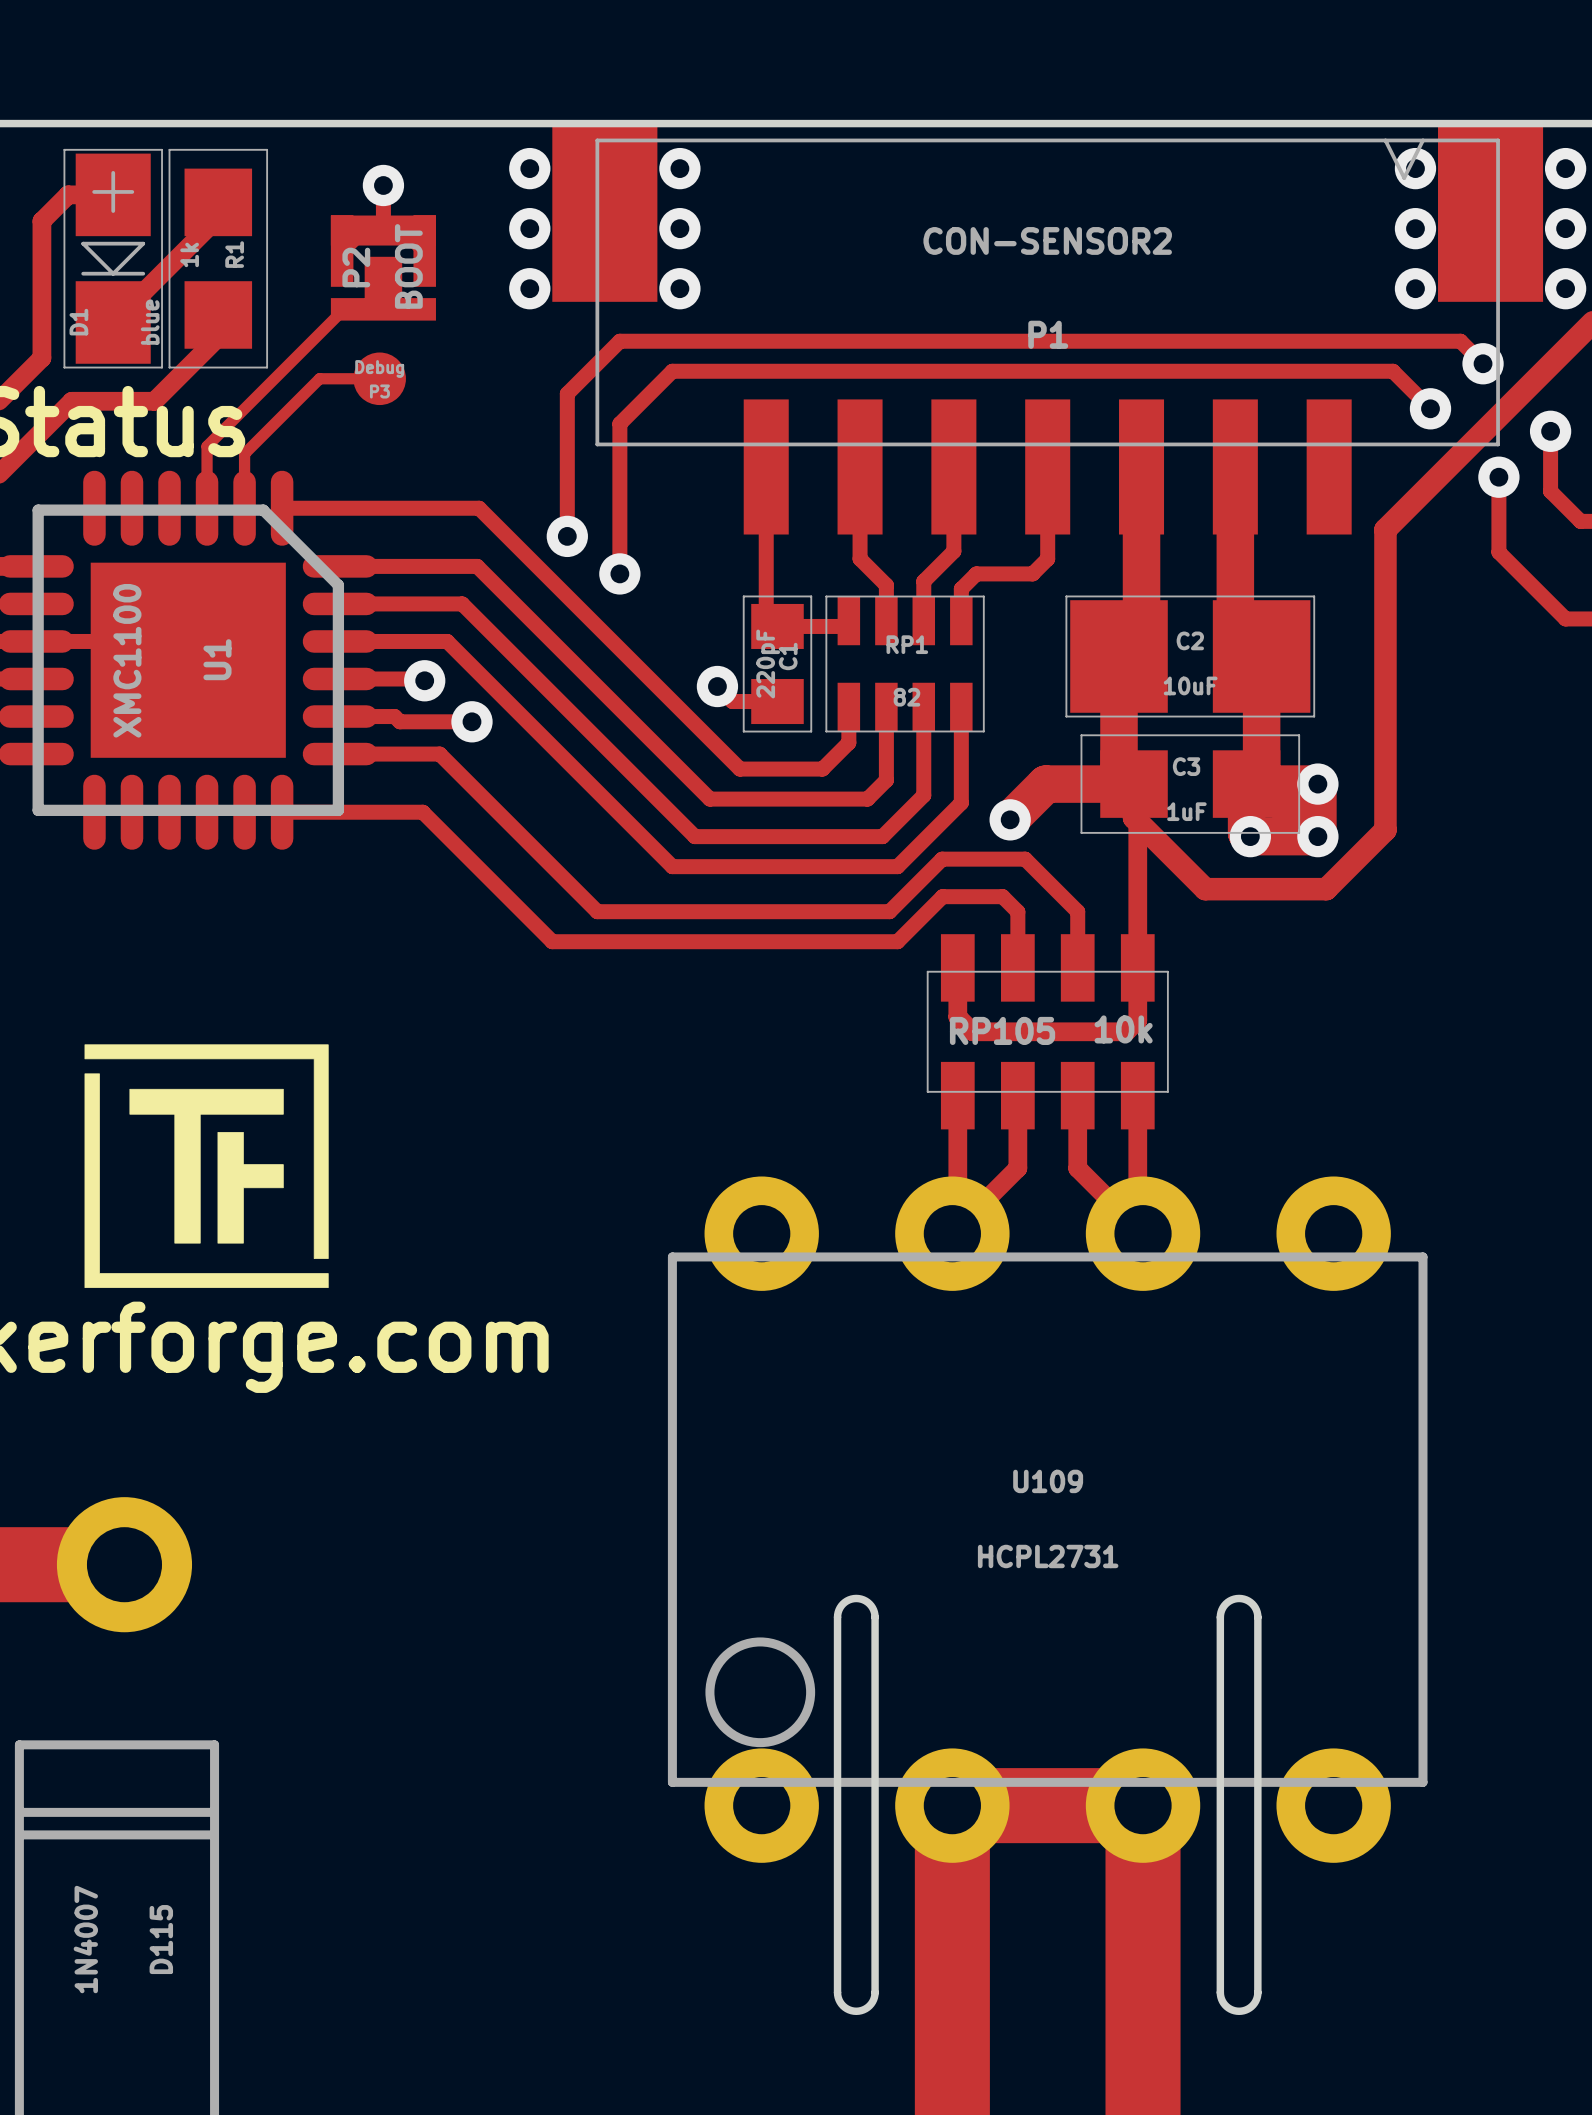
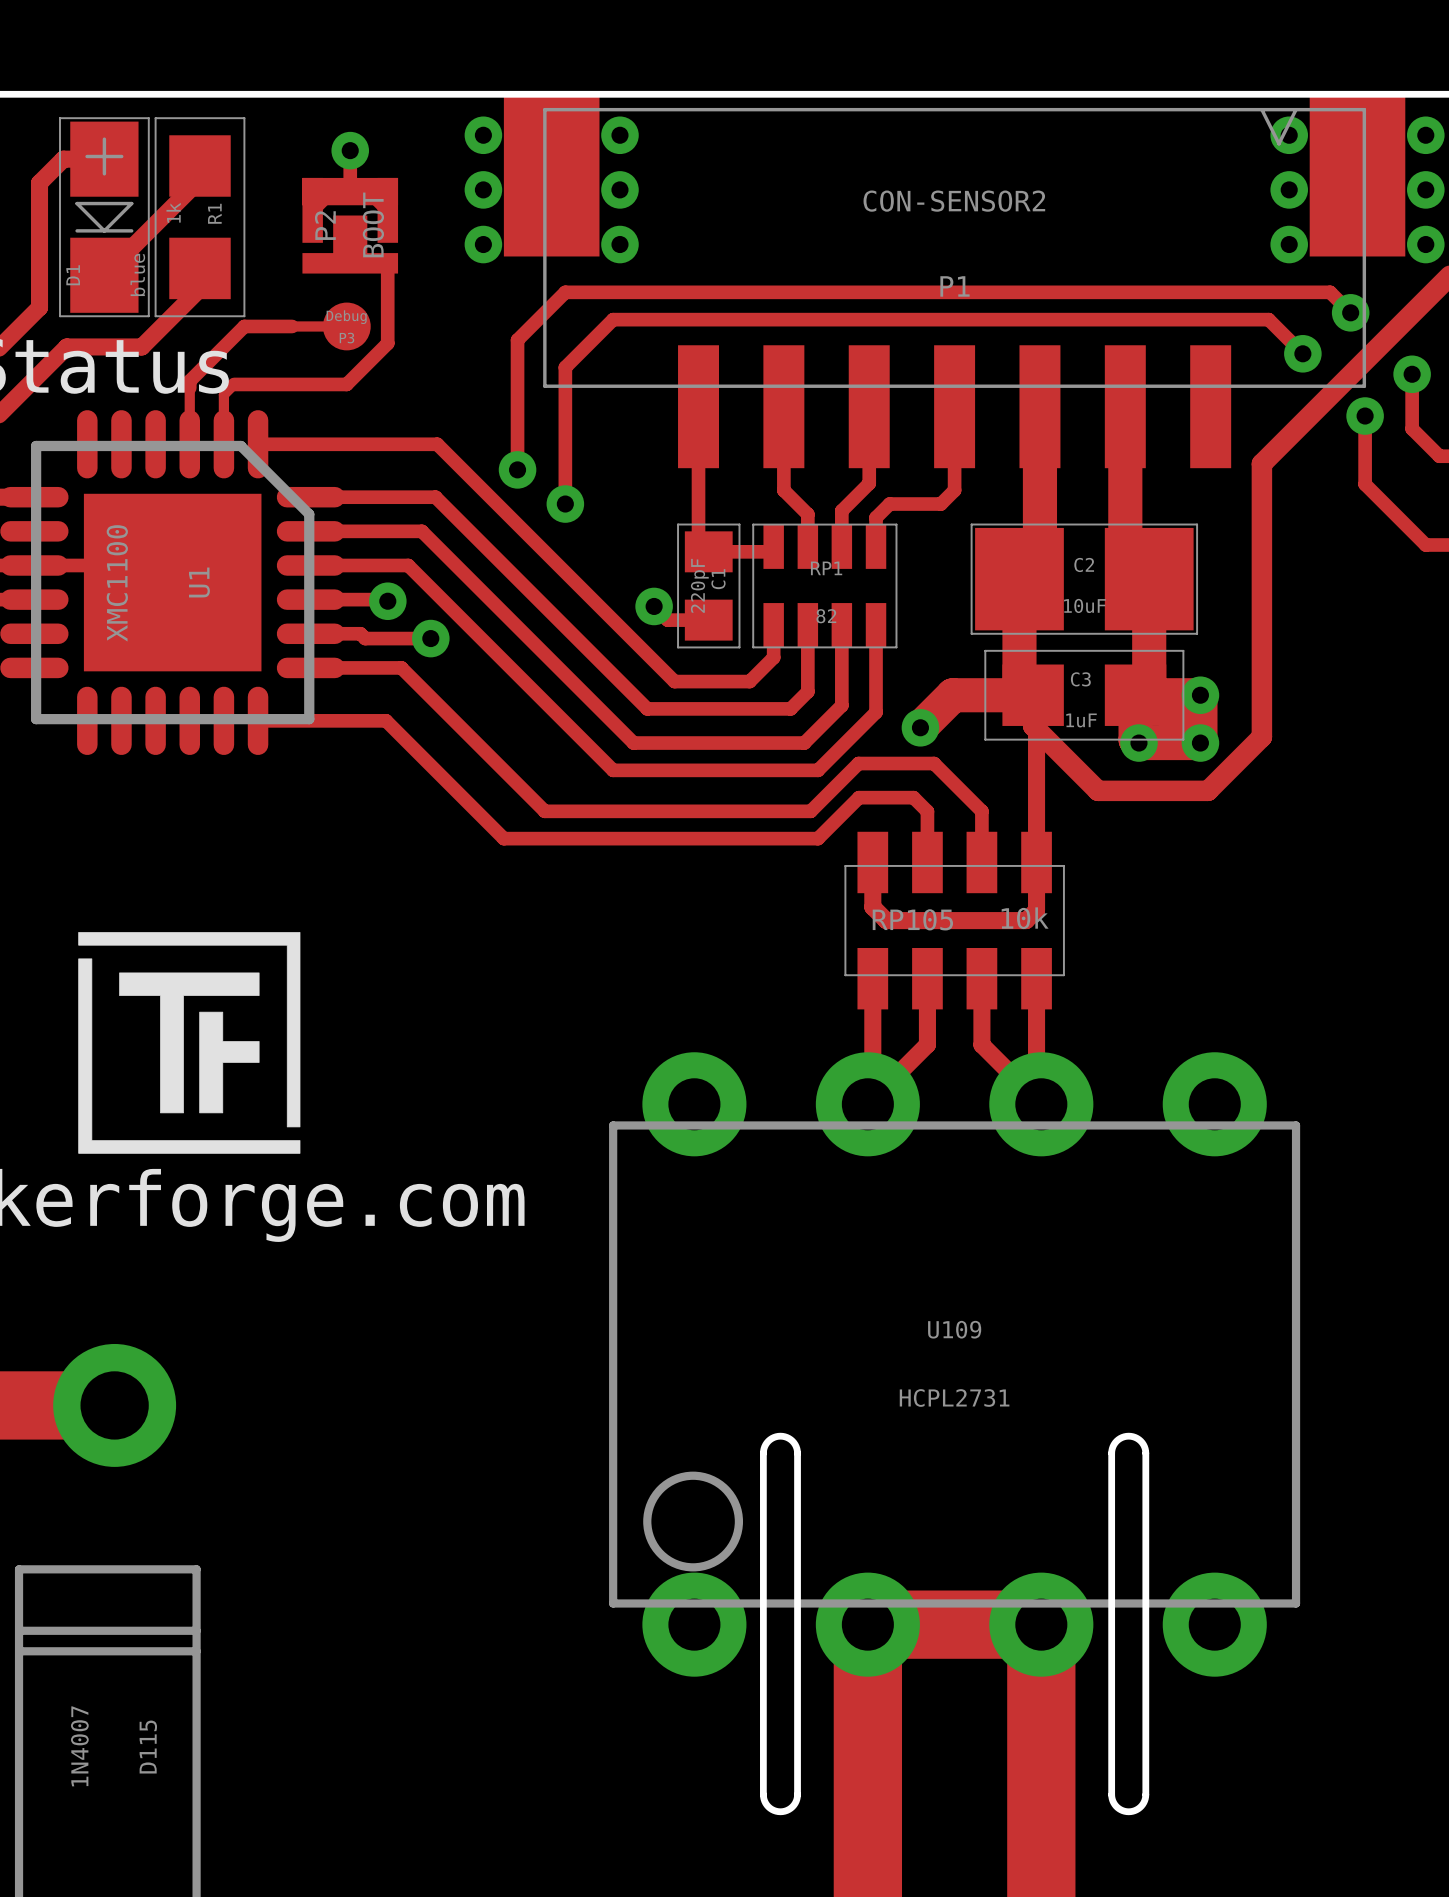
track: (383, 309) (344, 309) (207, 446) -> (350, 263) (387, 263) (387, 343) (346, 384) (234, 384)
track: (319, 378) (255, 442) -> (292, 326) (244, 326) (189, 381) (189, 387)

